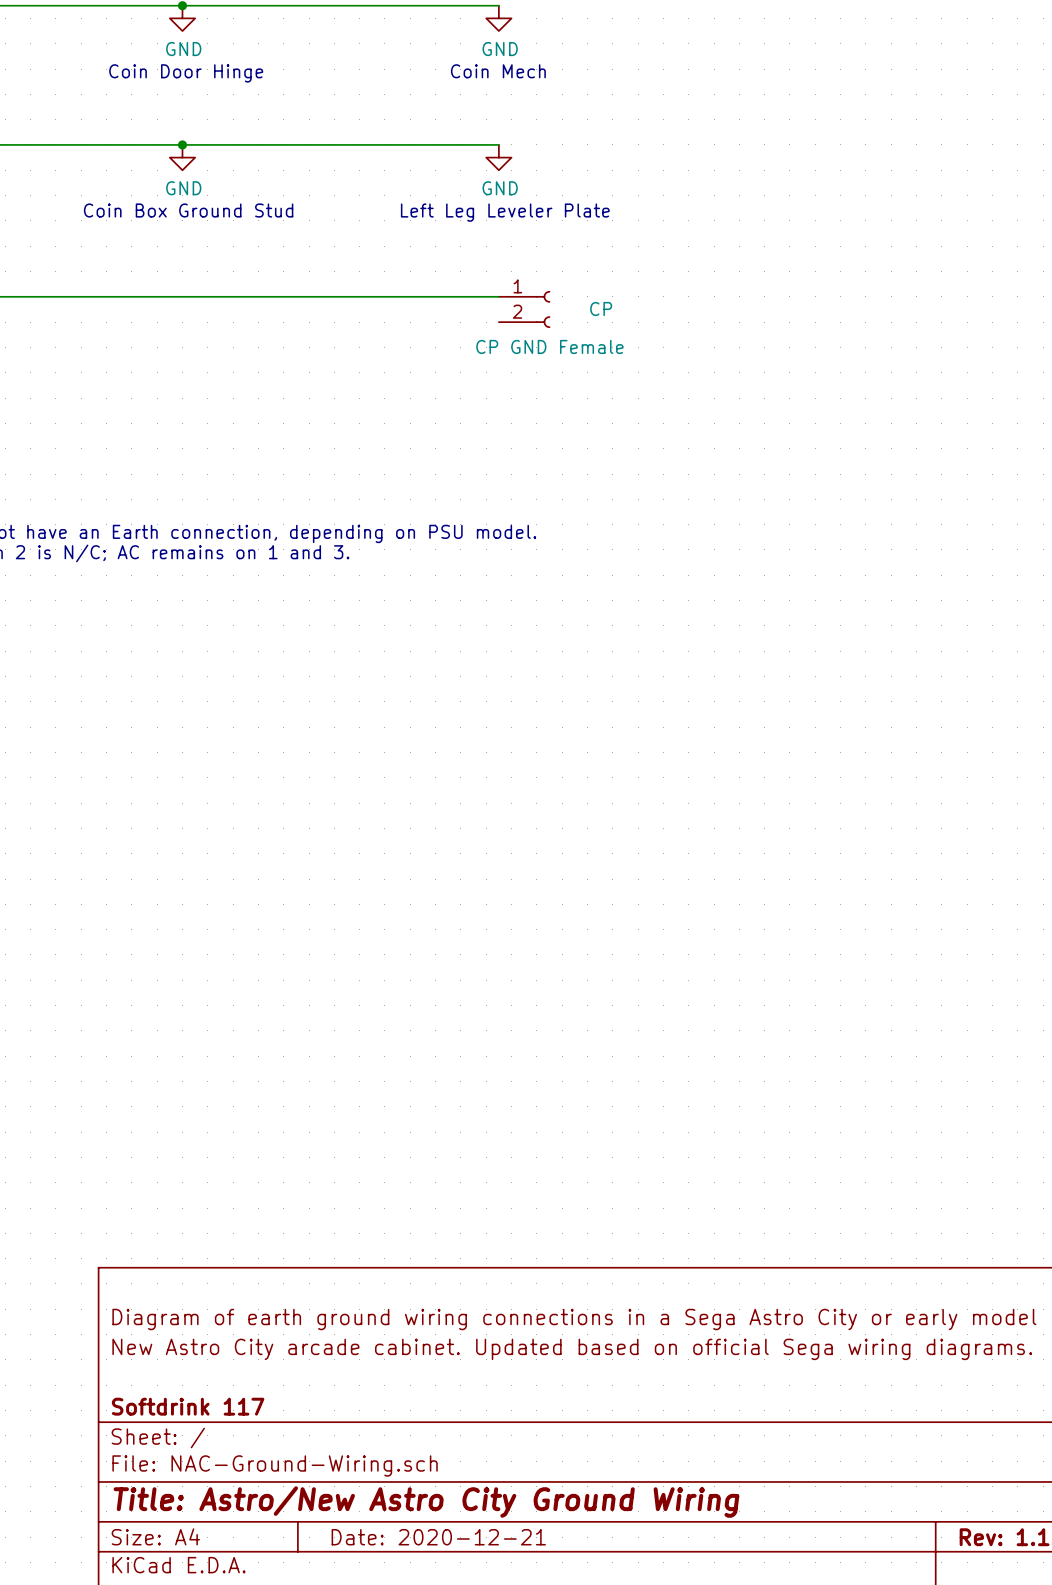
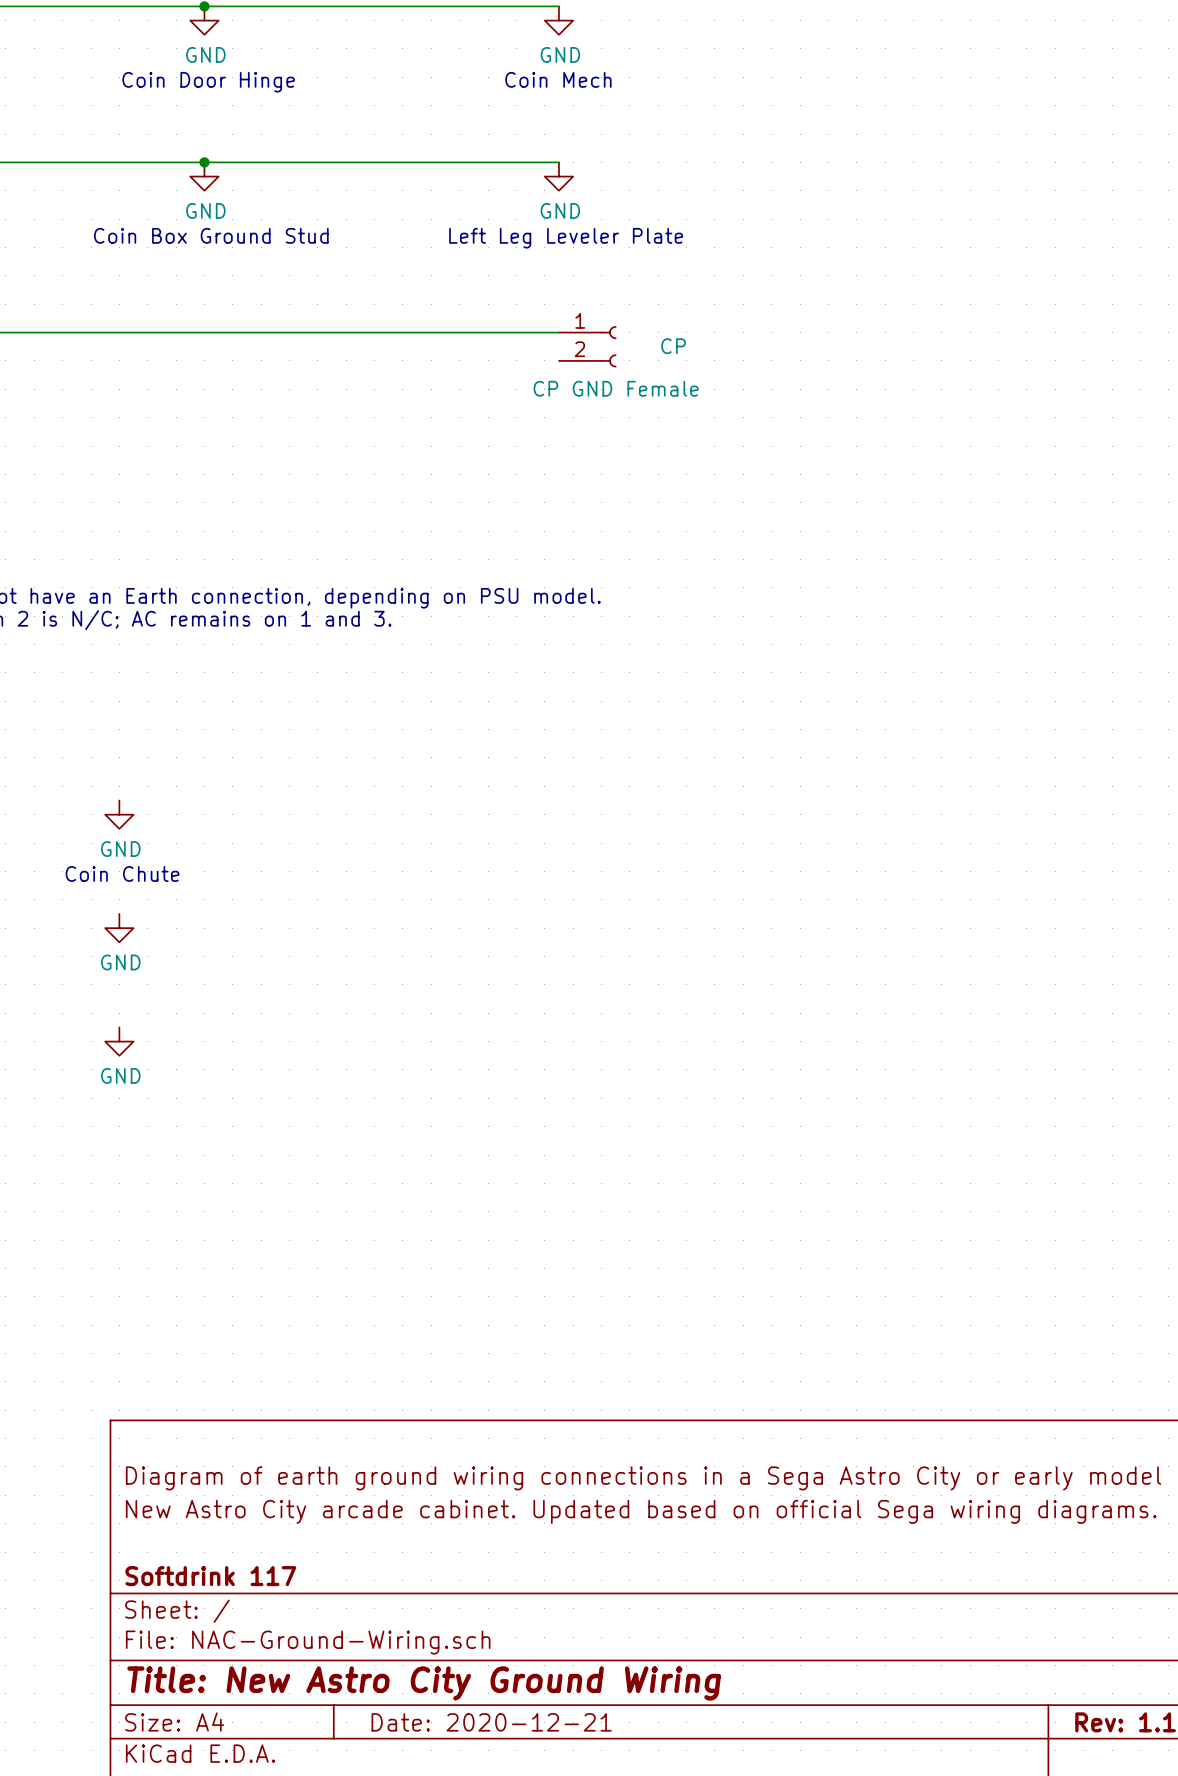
power symbol: none -> GND (119, 814)
text: none -> Coin Chute (122, 873)
power symbol: none -> GND (119, 928)
power symbol: none -> GND (119, 1041)
title block: Title: Astro/New Astro City Ground Wiring (426, 1502) -> Title: New Astro City Ground Wiring (424, 1683)

